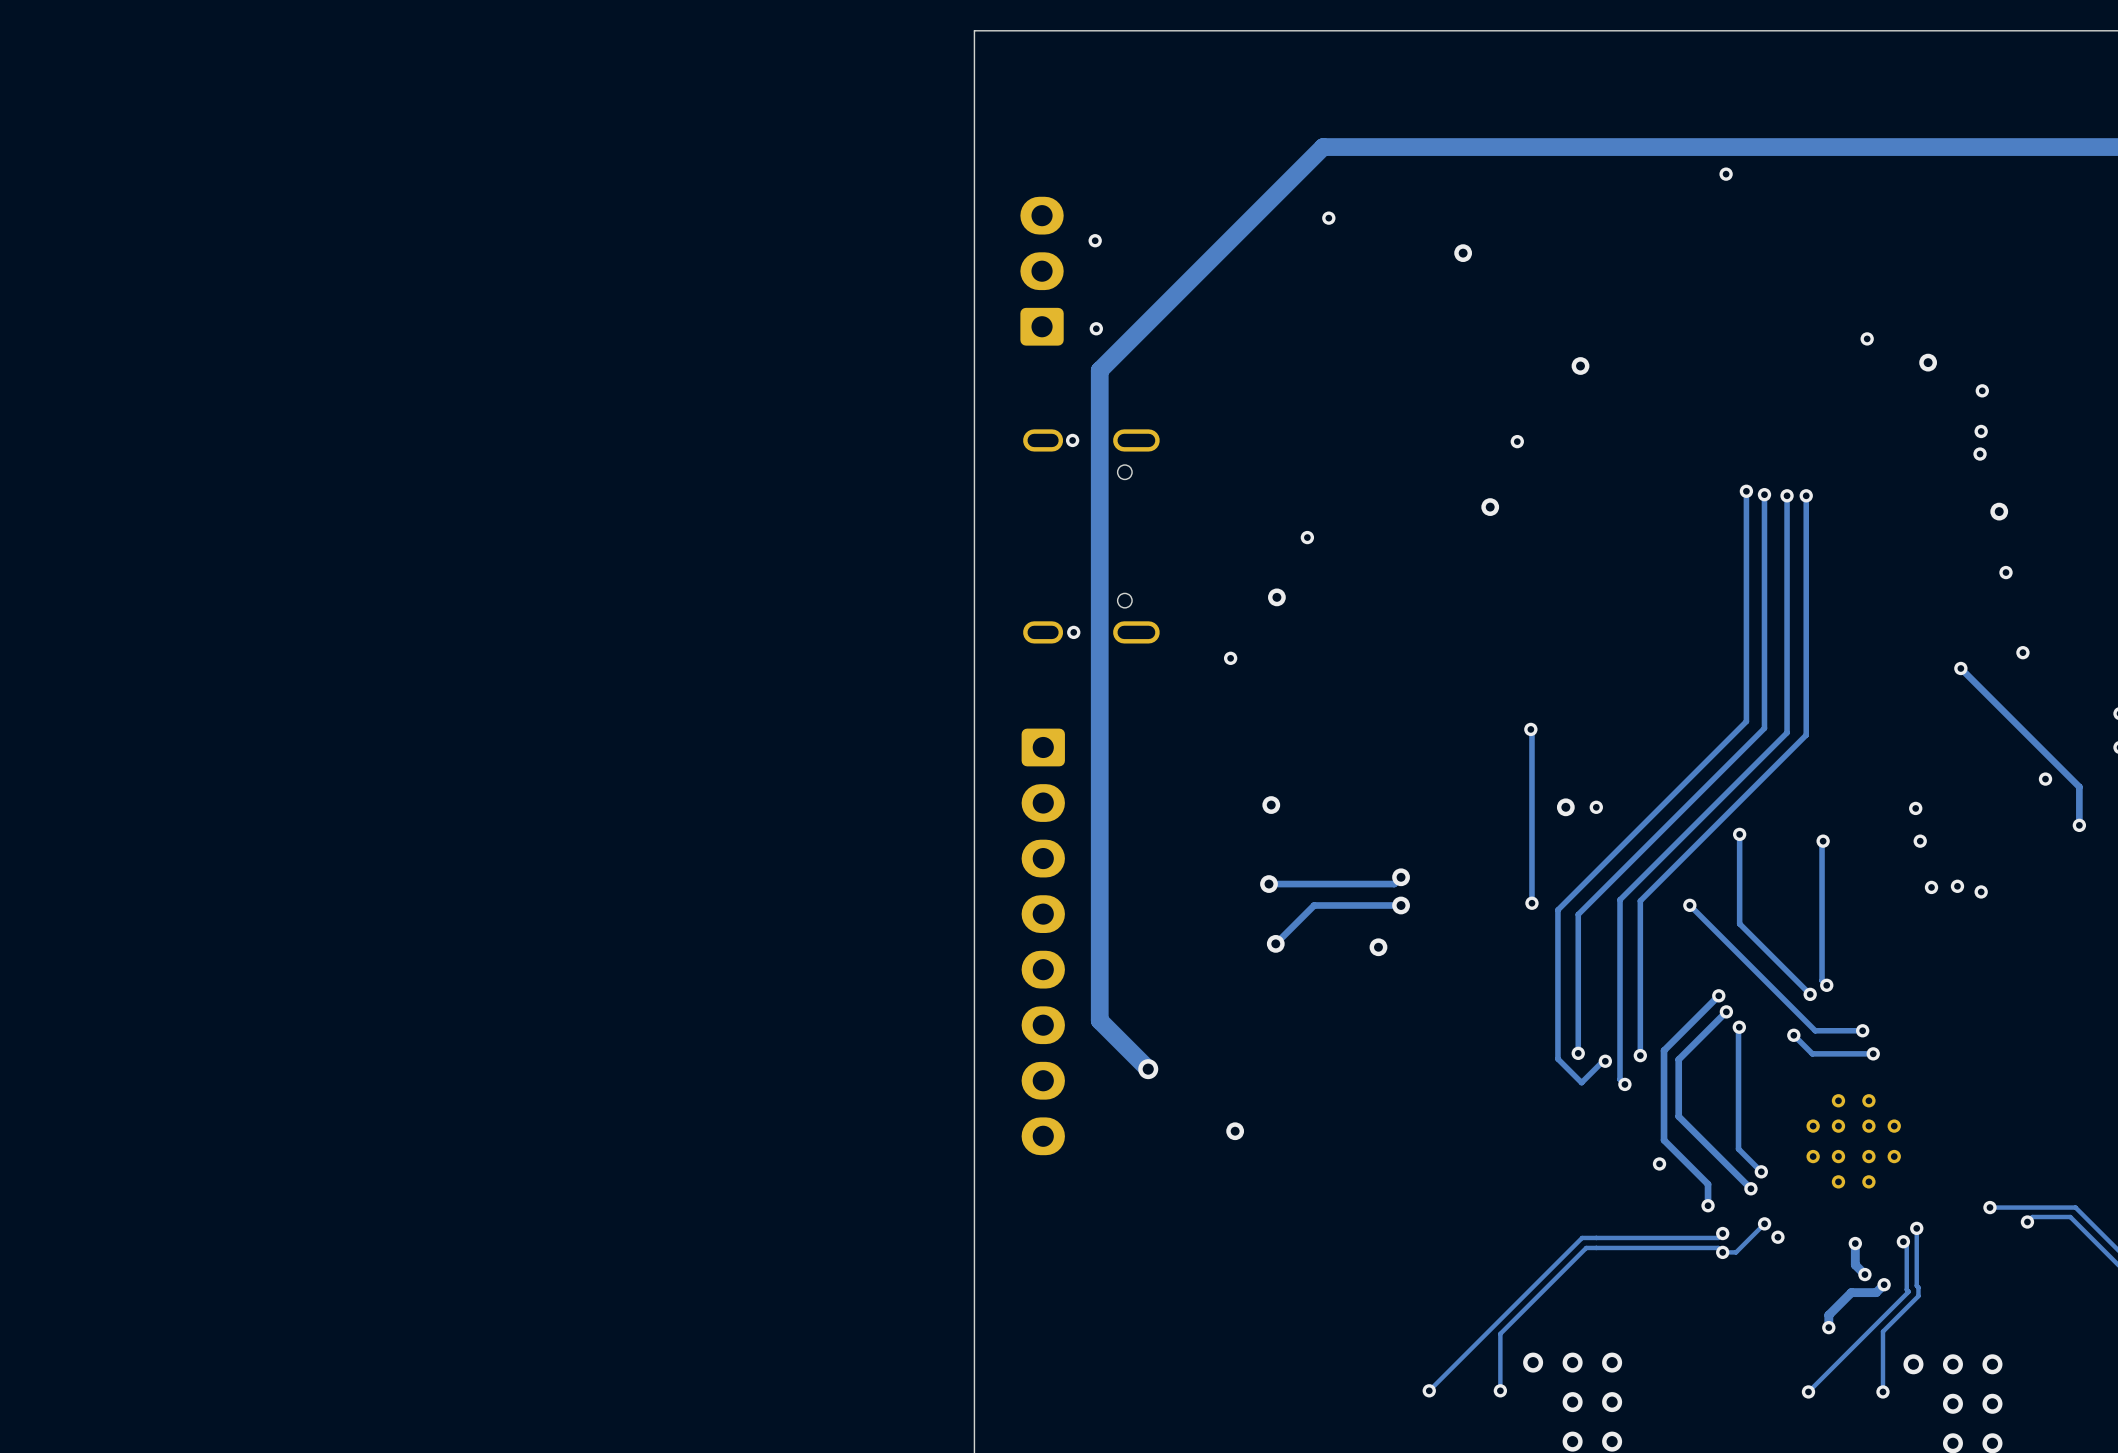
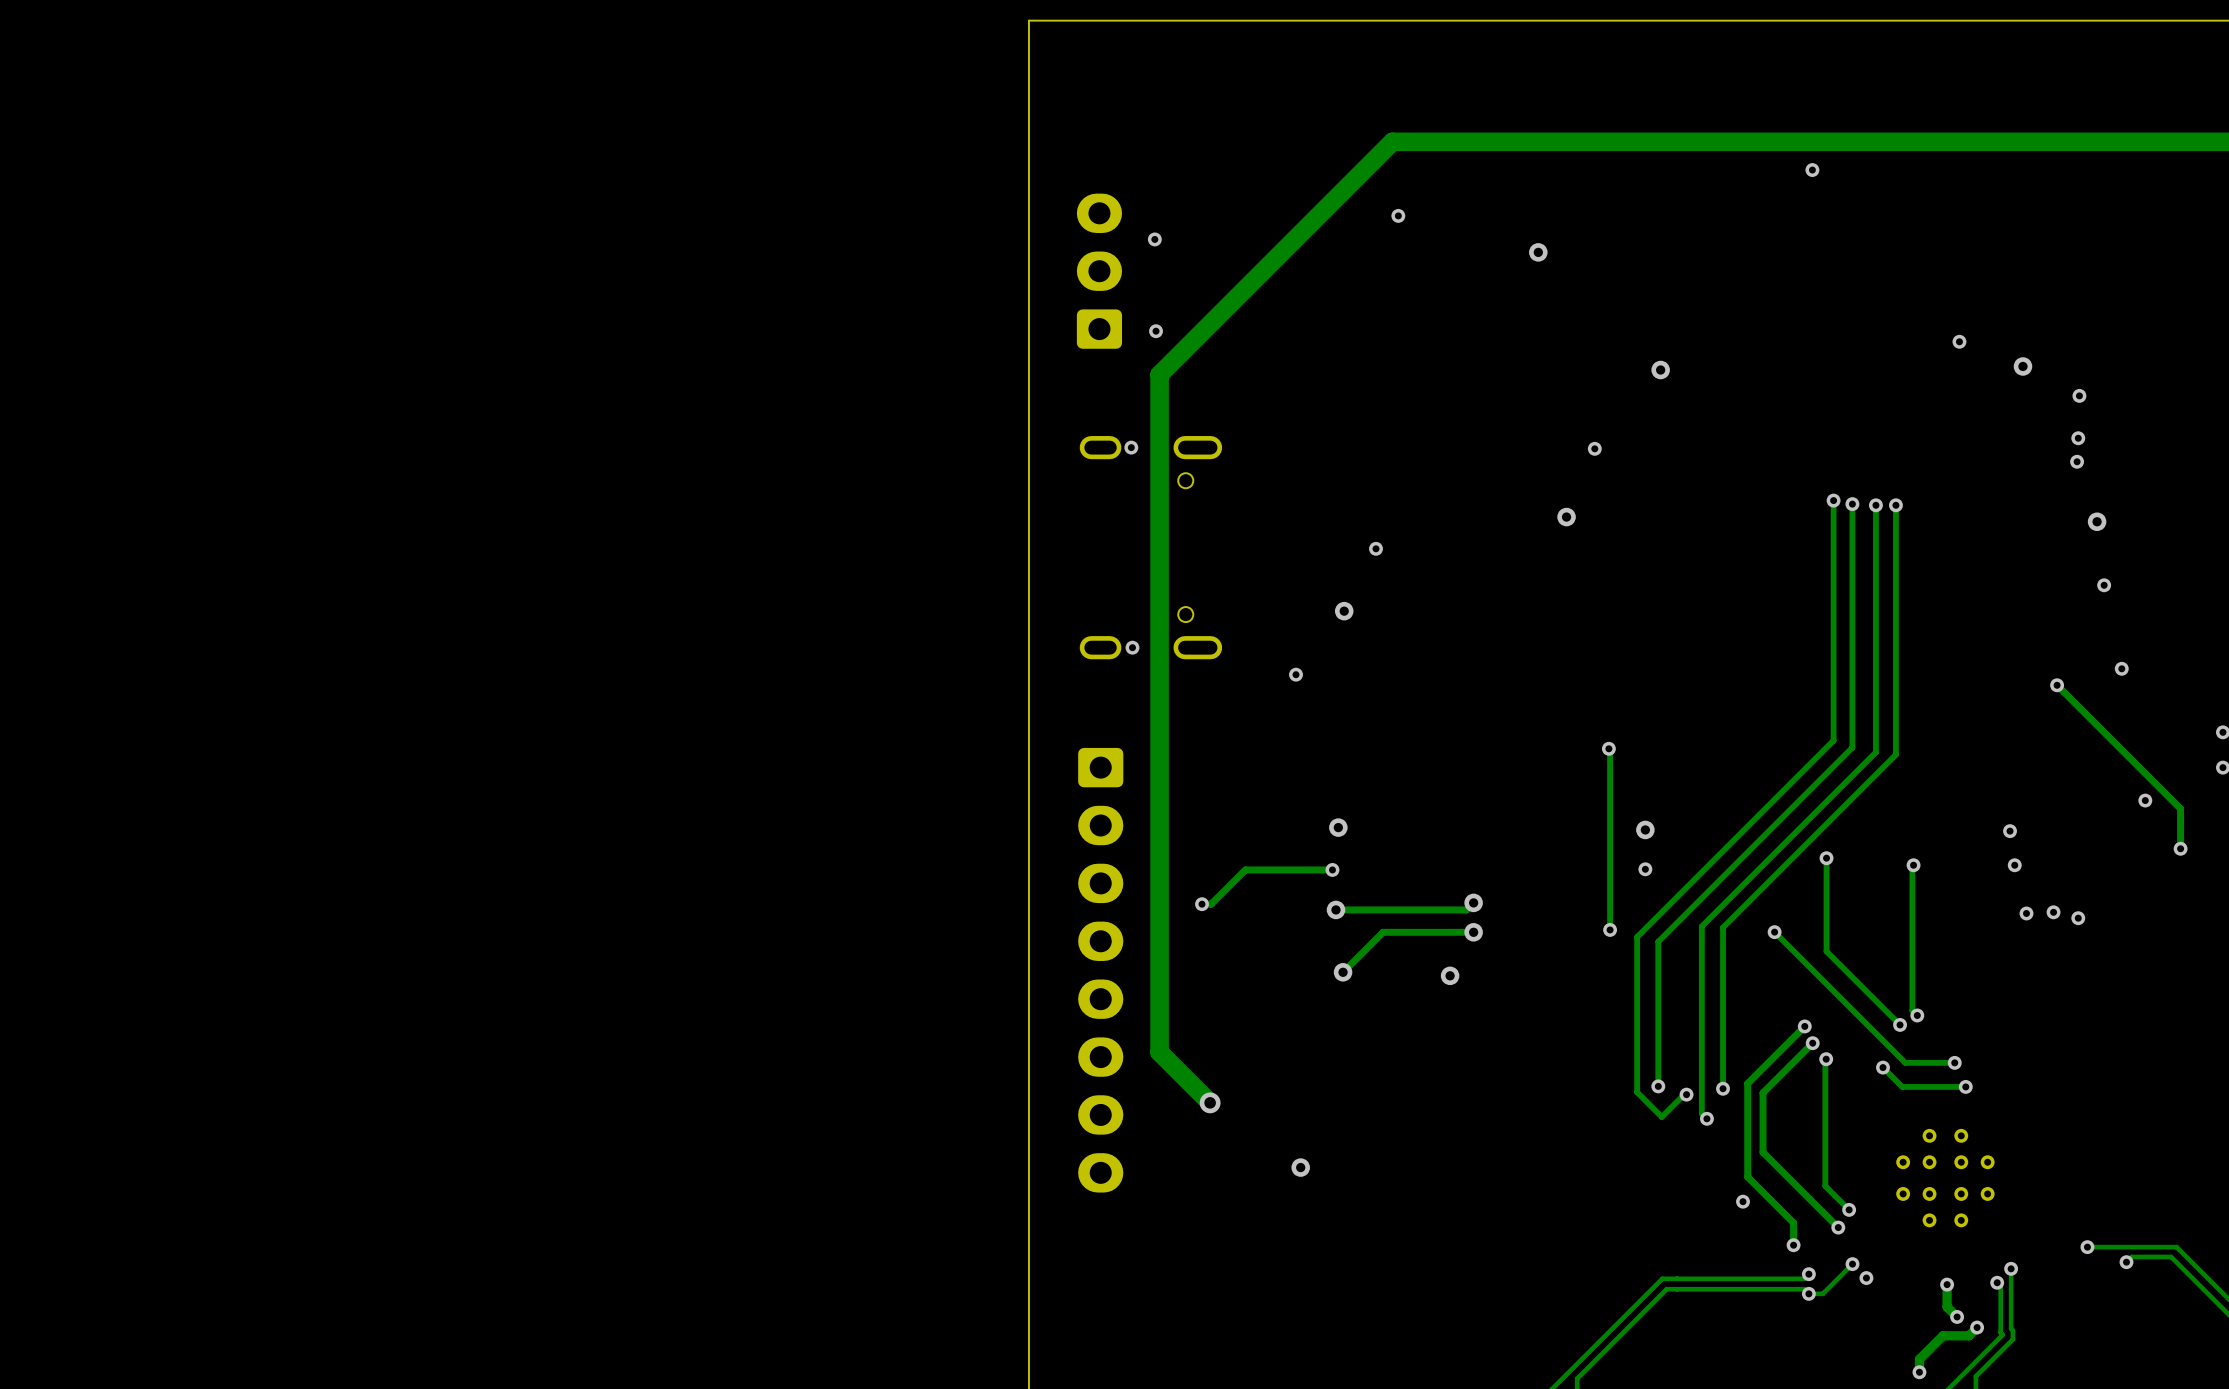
via position: (1596, 807) -> (1645, 869)
track: none -> (1332, 869) (1245, 869) (1211, 904) (1202, 904)
via: none -> (1332, 869)
via: none -> (1202, 904)

